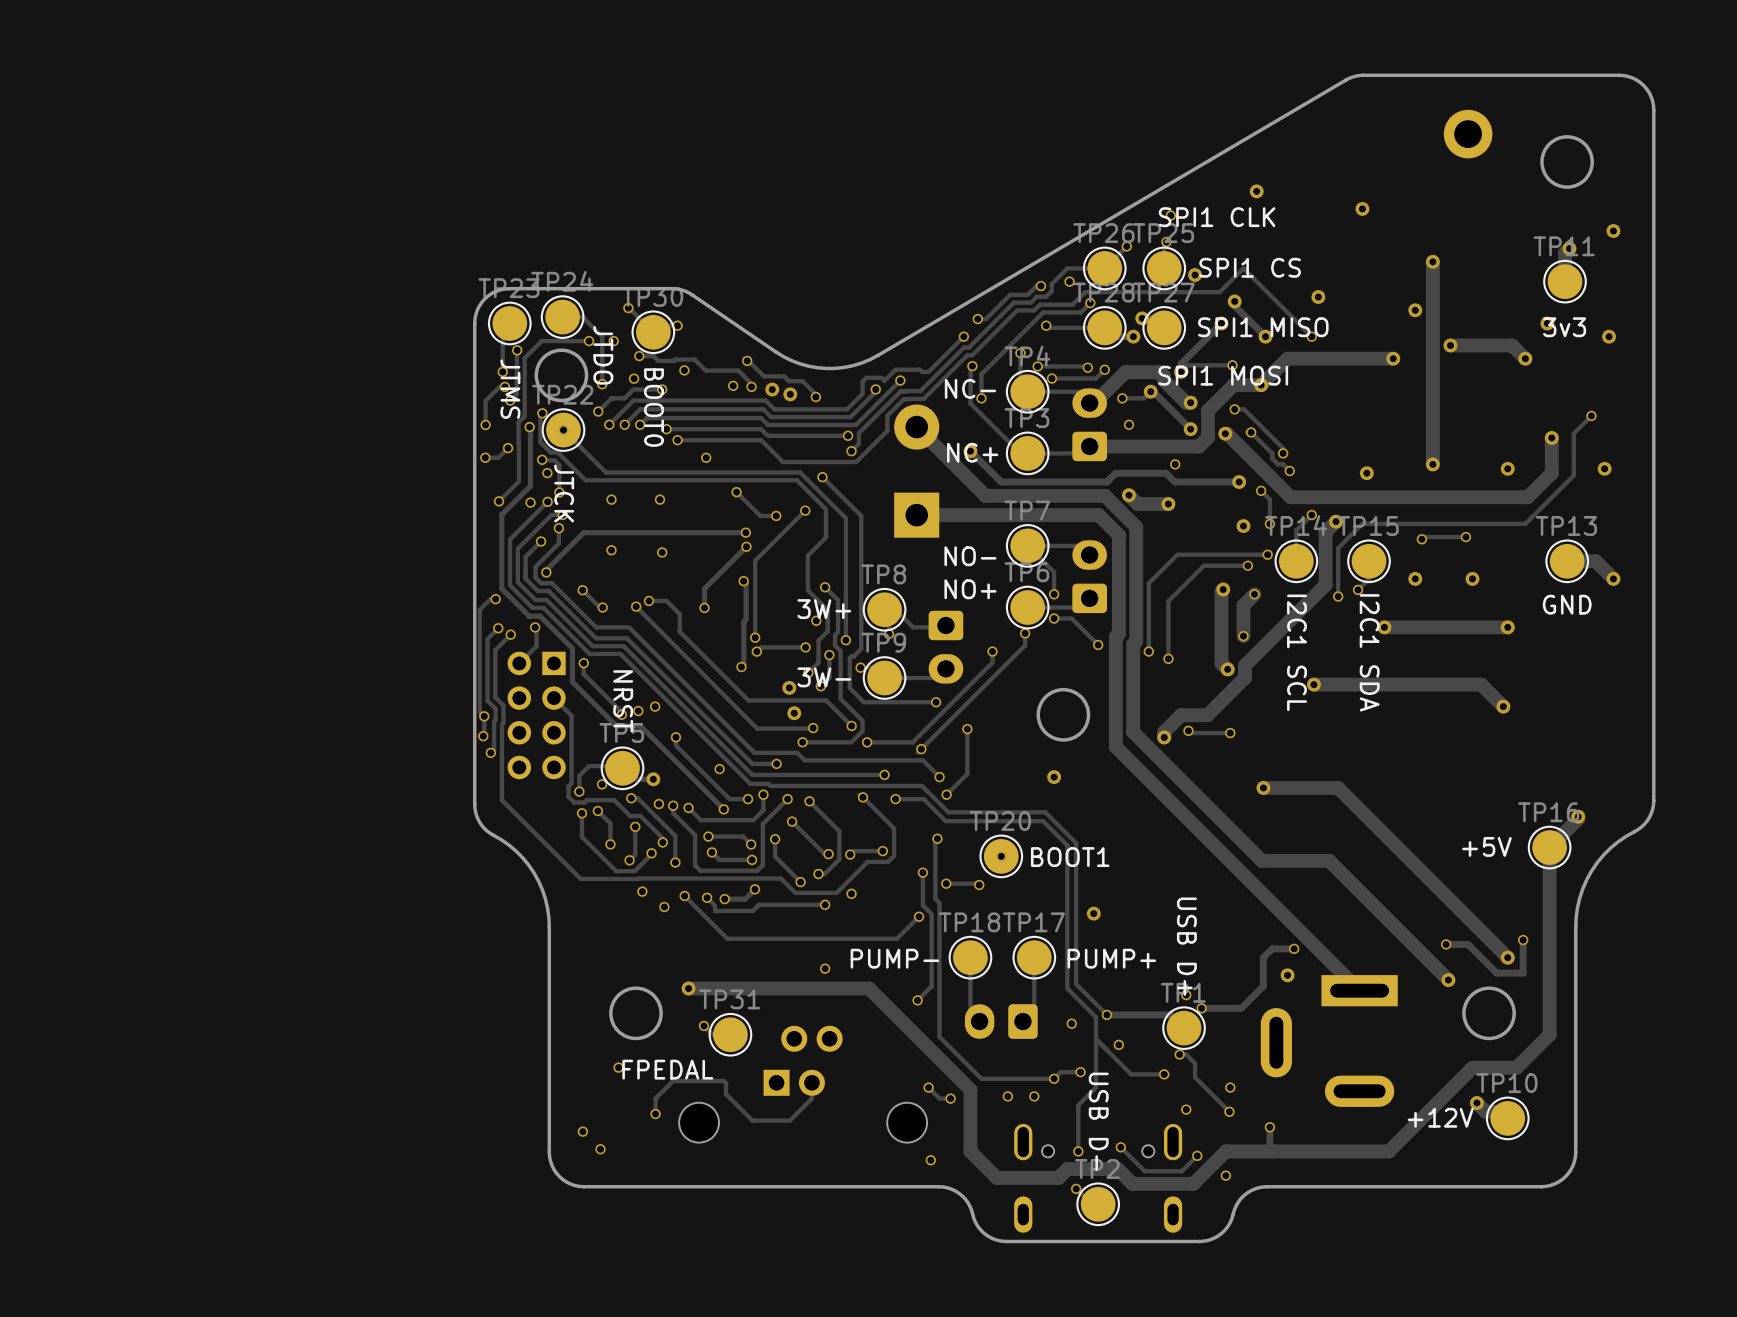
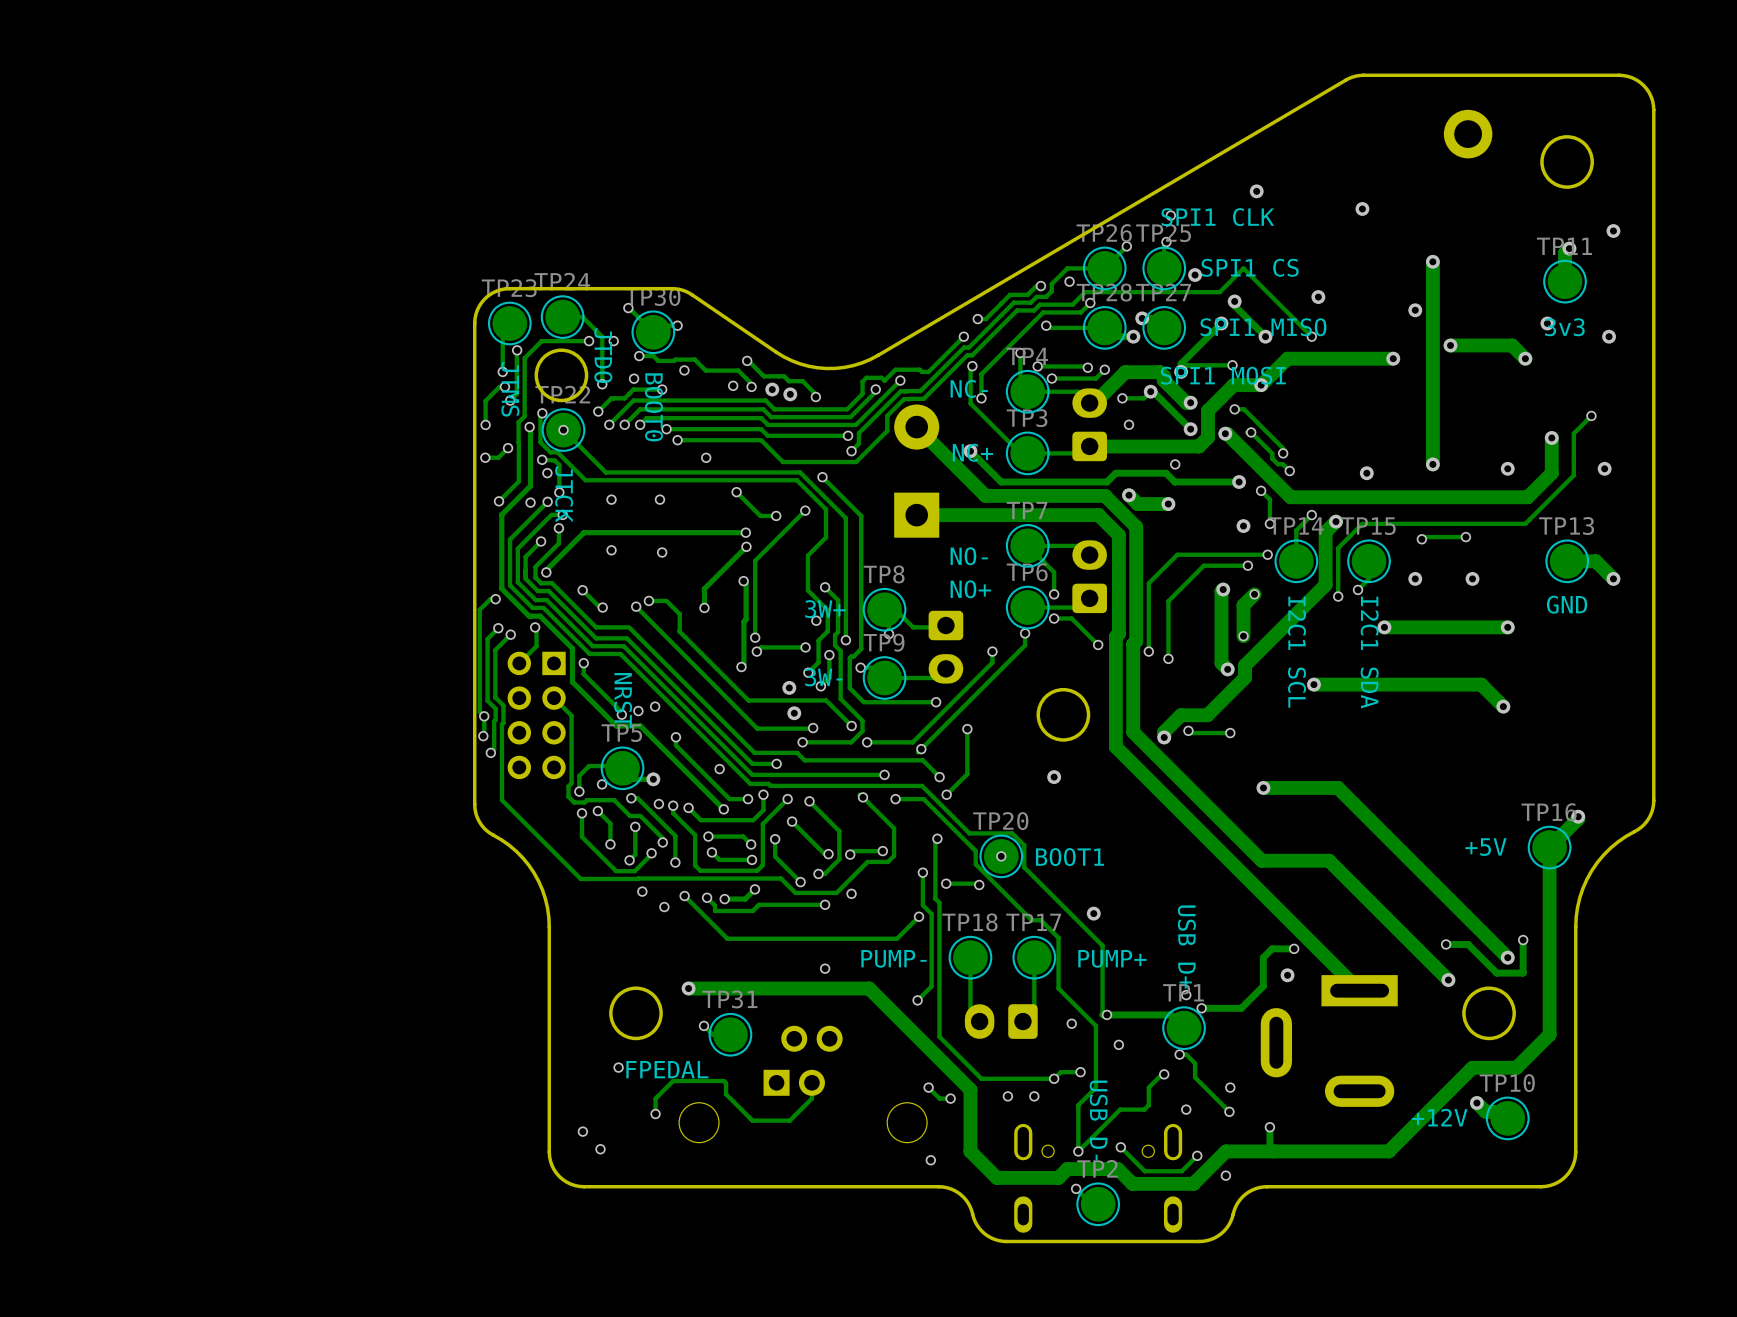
track: (948, 812) (1045, 812) (1076, 843) (1076, 984) (1106, 1014) -> (948, 812) (969, 833) (1012, 833) (1024, 845) (1024, 867) (1102, 945) (1102, 1014) (1106, 1014)
track: (945, 821) (1043, 821) (1067, 845) (1067, 988) (1095, 1017) (1095, 1025) -> (945, 821) (975, 851) (975, 864) (1031, 920) (1040, 920) (1058, 937) (1058, 988) (1095, 1025)
track: (1095, 1039) (1131, 1074) (1162, 1074) -> (1078, 1151) (1120, 1109) (1144, 1109) (1148, 1105) (1148, 1087) (1162, 1074)

